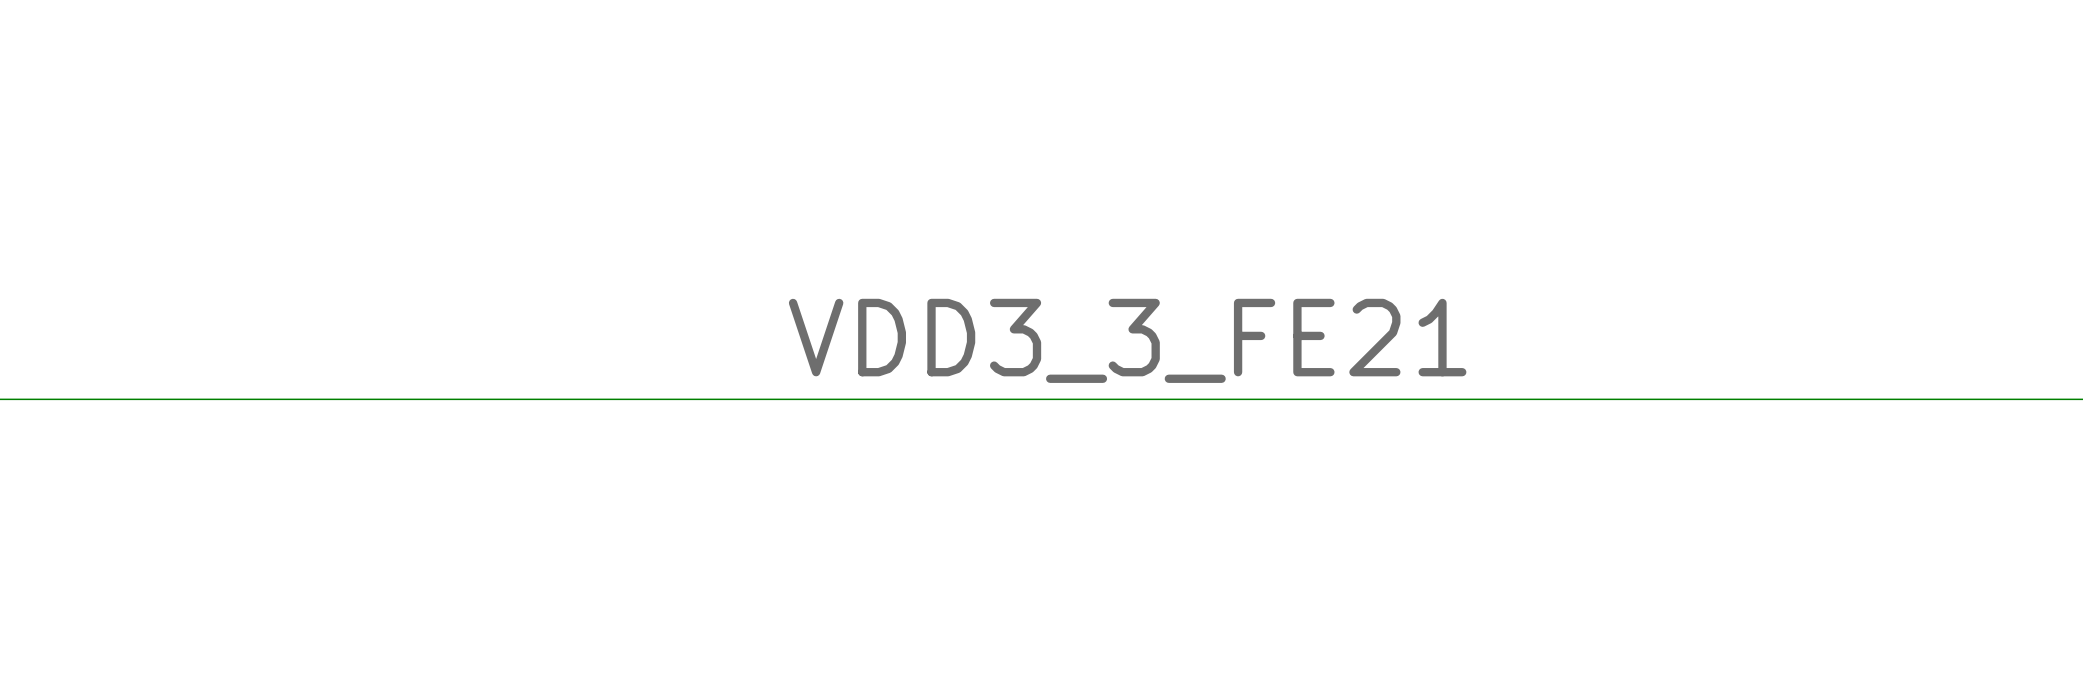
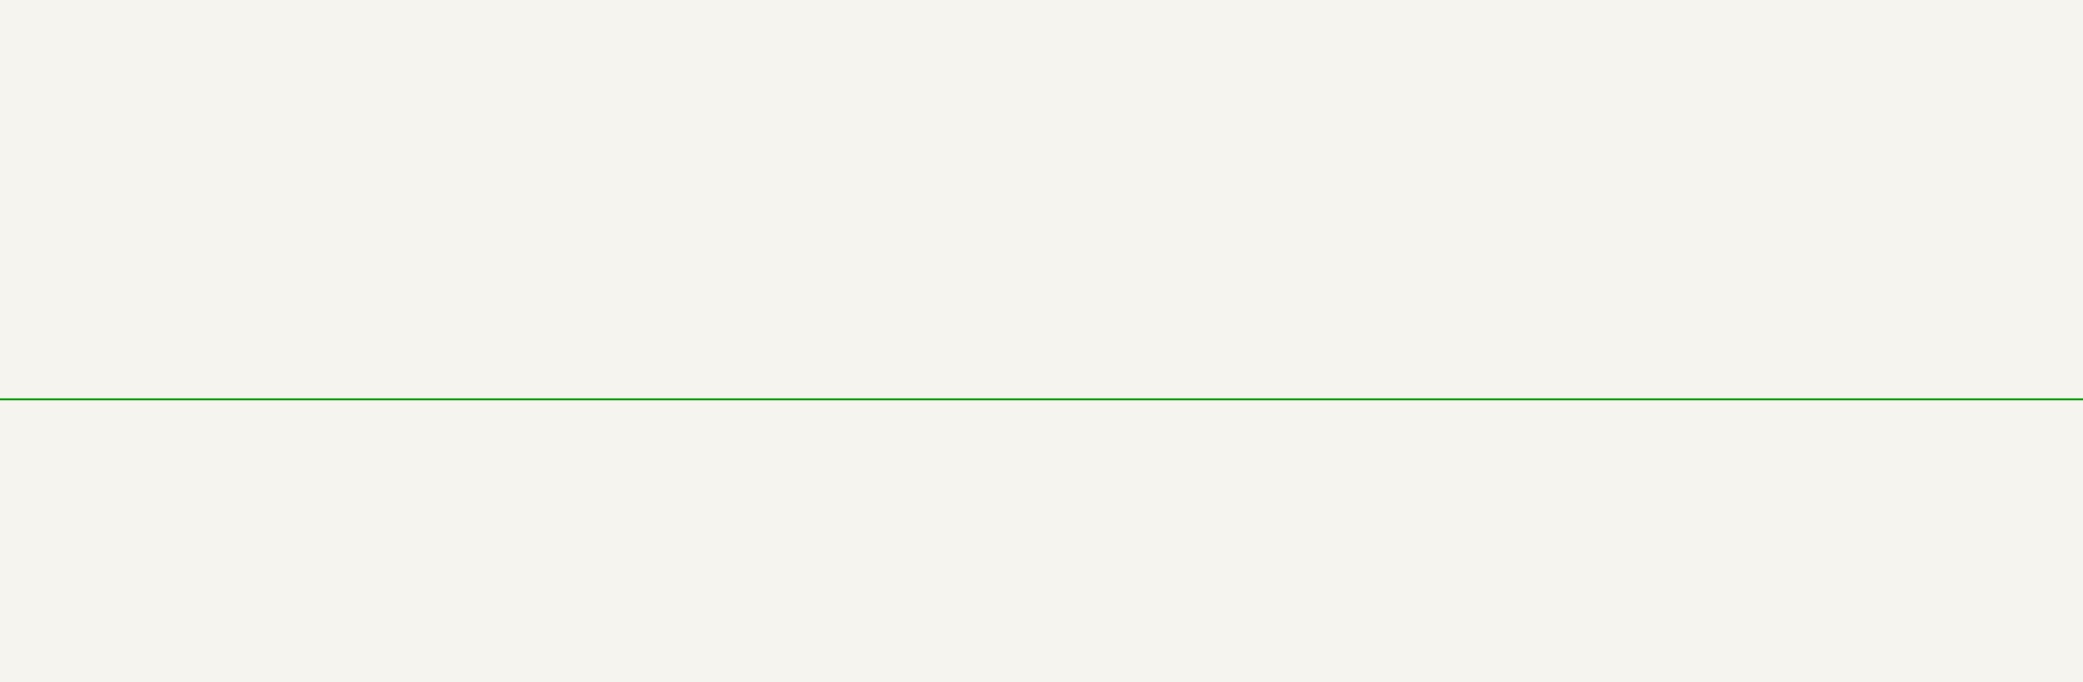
label: VDD3_3_FE21 (1127, 340) -> none

